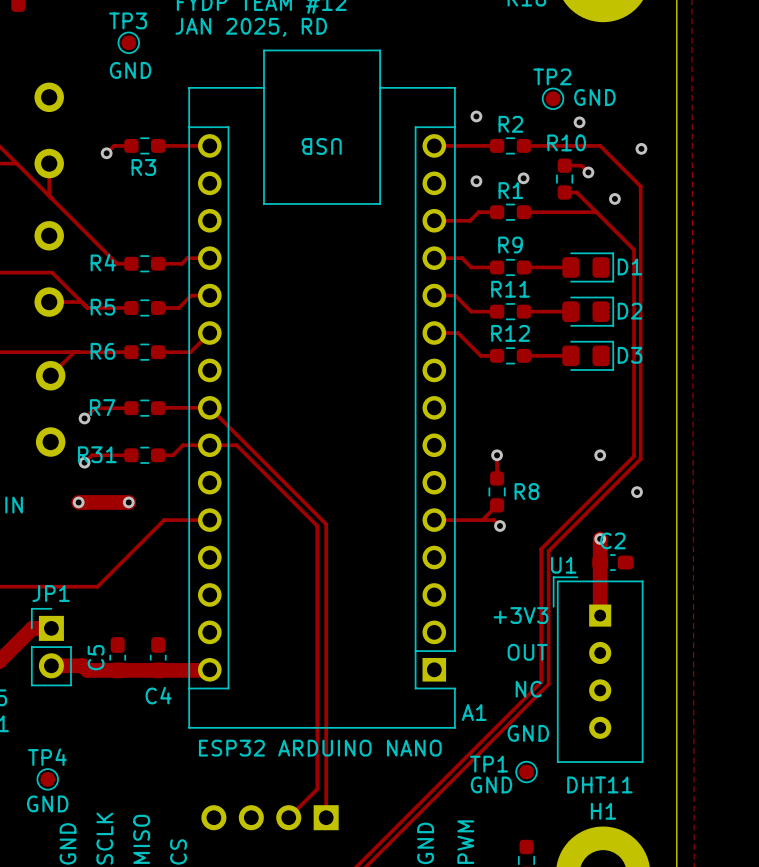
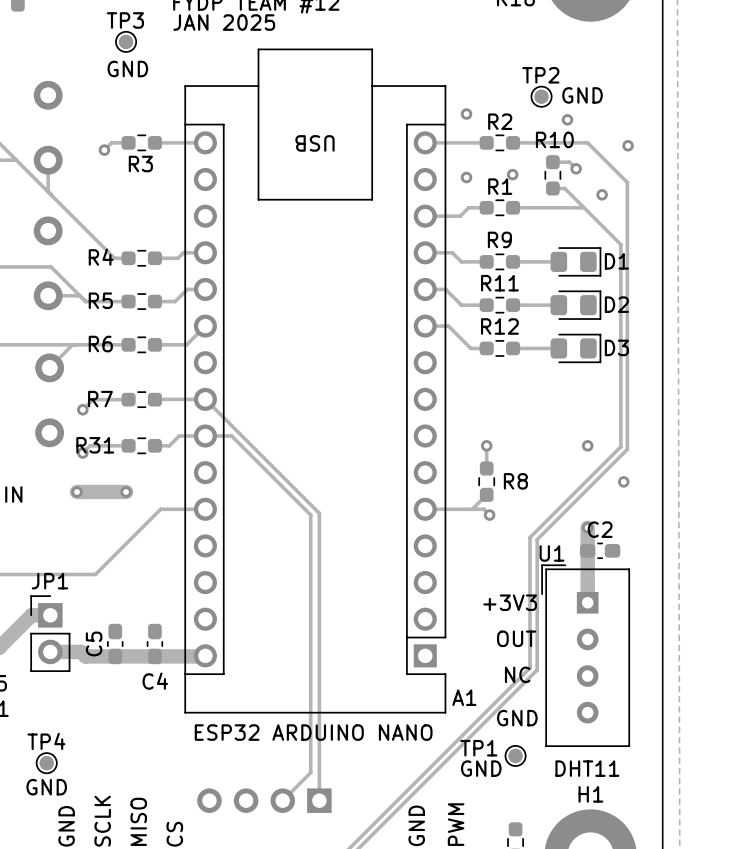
text: JAN 2025, RD (251, 27) -> JAN 2025 (224, 22)

